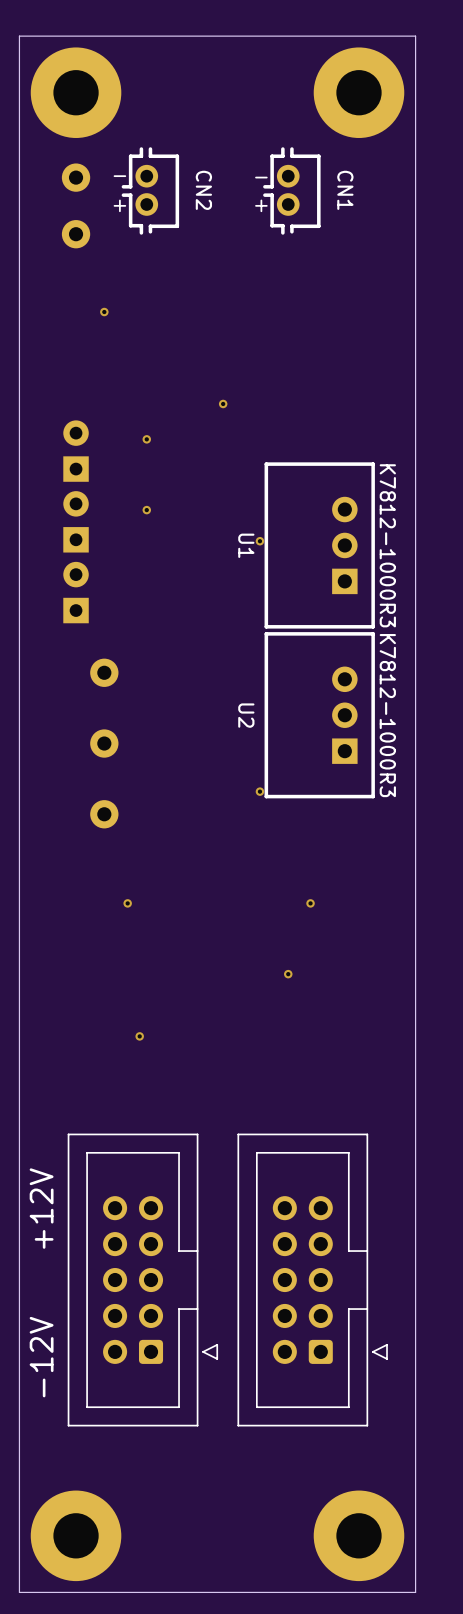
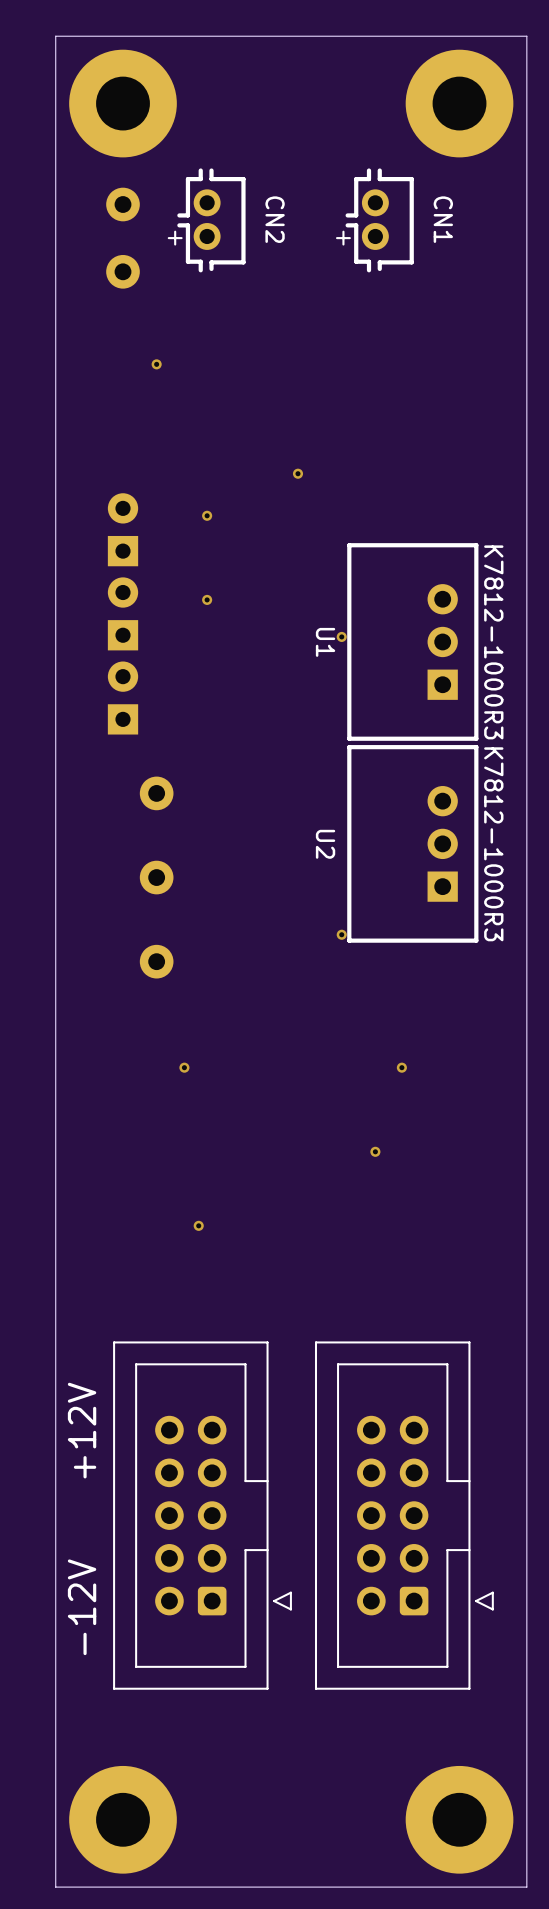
text: - (119, 176) -> none
text: - (261, 177) -> none

